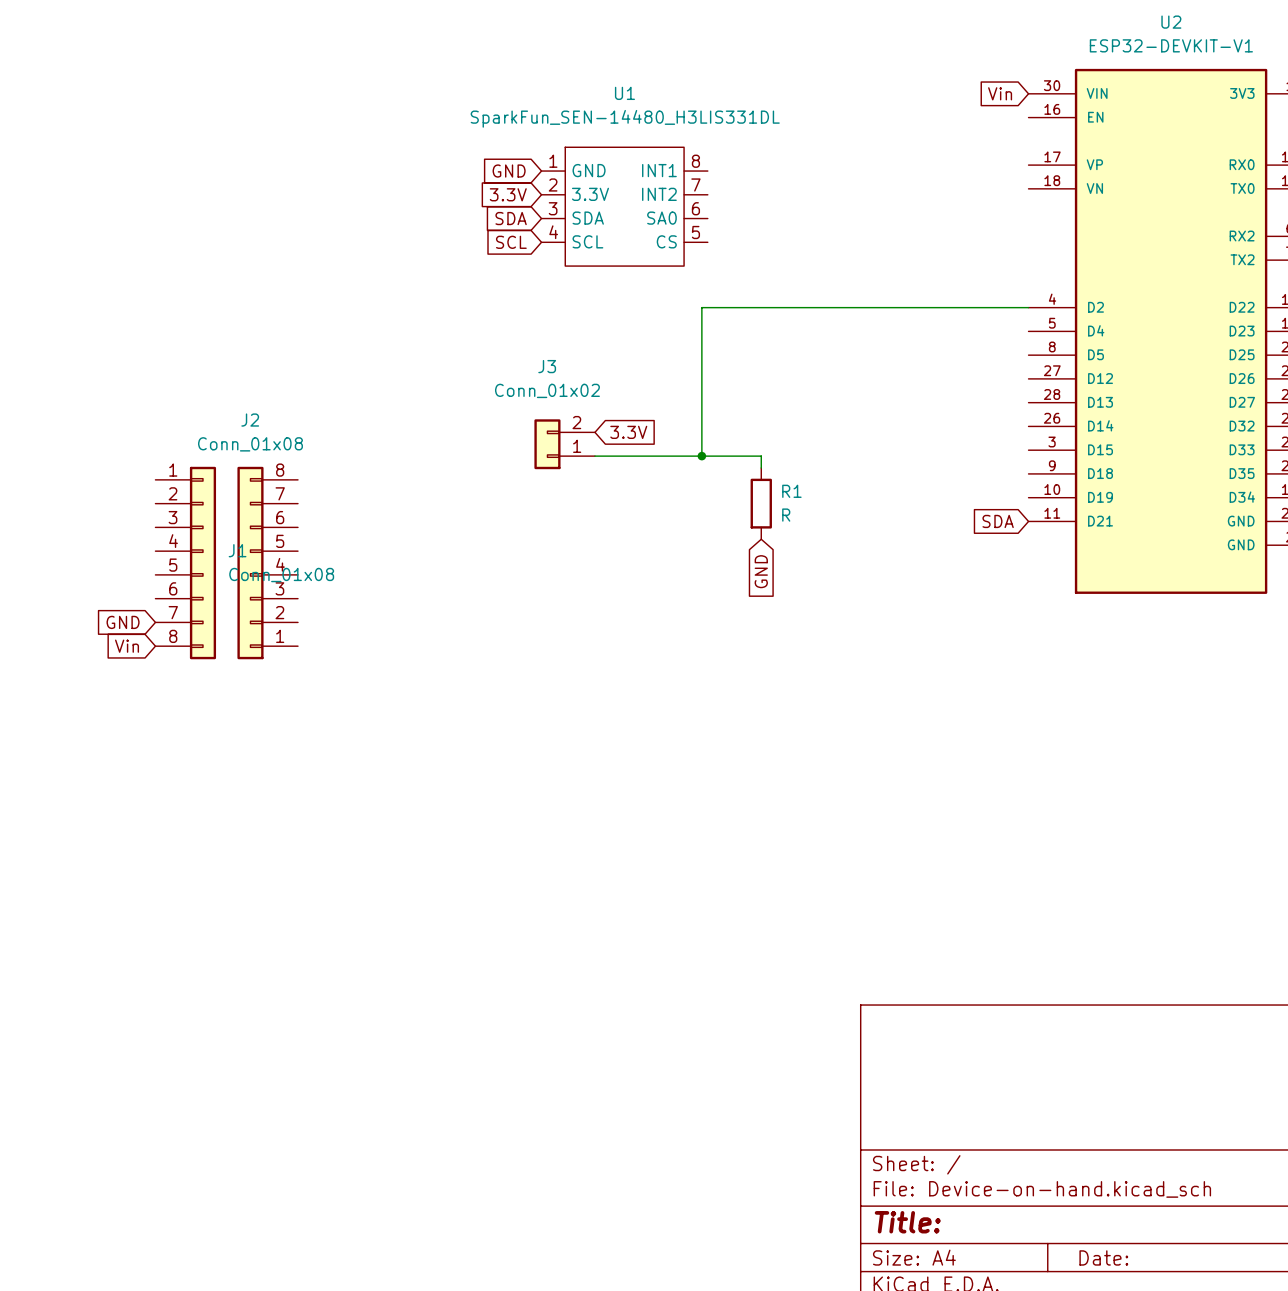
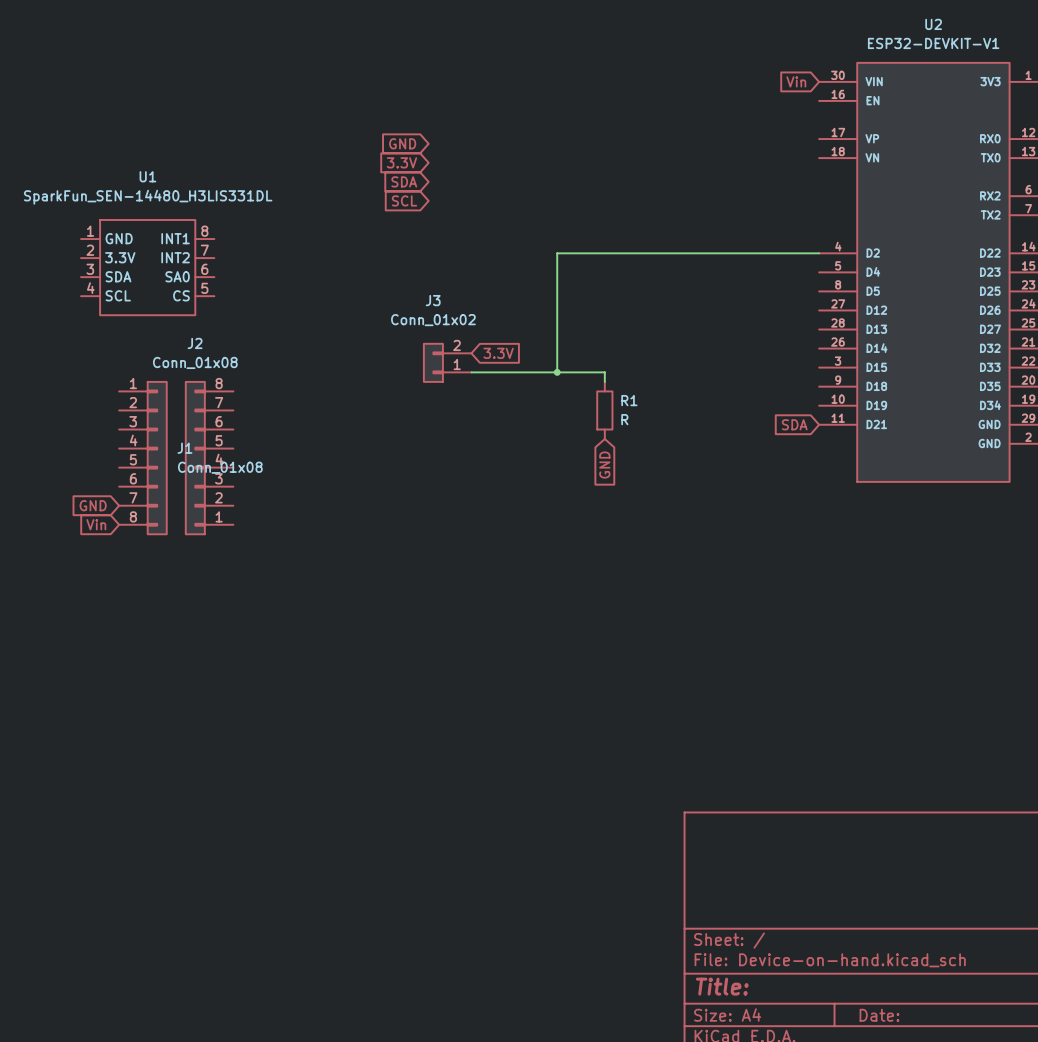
U1 position: (624, 206) -> (147, 267)

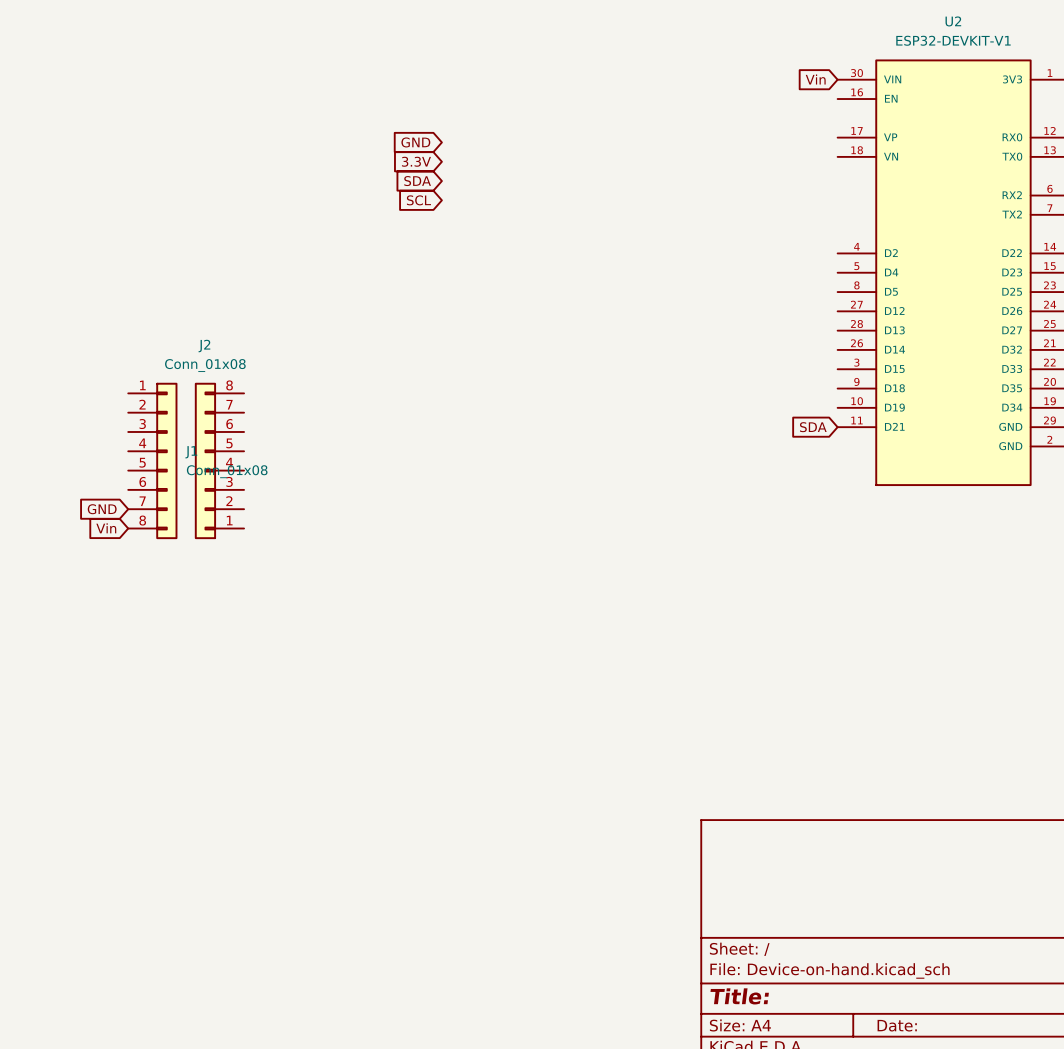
wire: (819, 253) (557, 253) (557, 372) -> none
U1: SparkFun_SEN-14480_H3LIS331DL (147, 267) -> none
global label: 3.3V (498, 353) -> none
J3: Conn_01x02 (447, 362) -> none
wire: (471, 372) (604, 372) (604, 381) -> none
junction: (557, 372) -> none
R1: R (604, 410) -> none
global label: GND (604, 465) -> none

